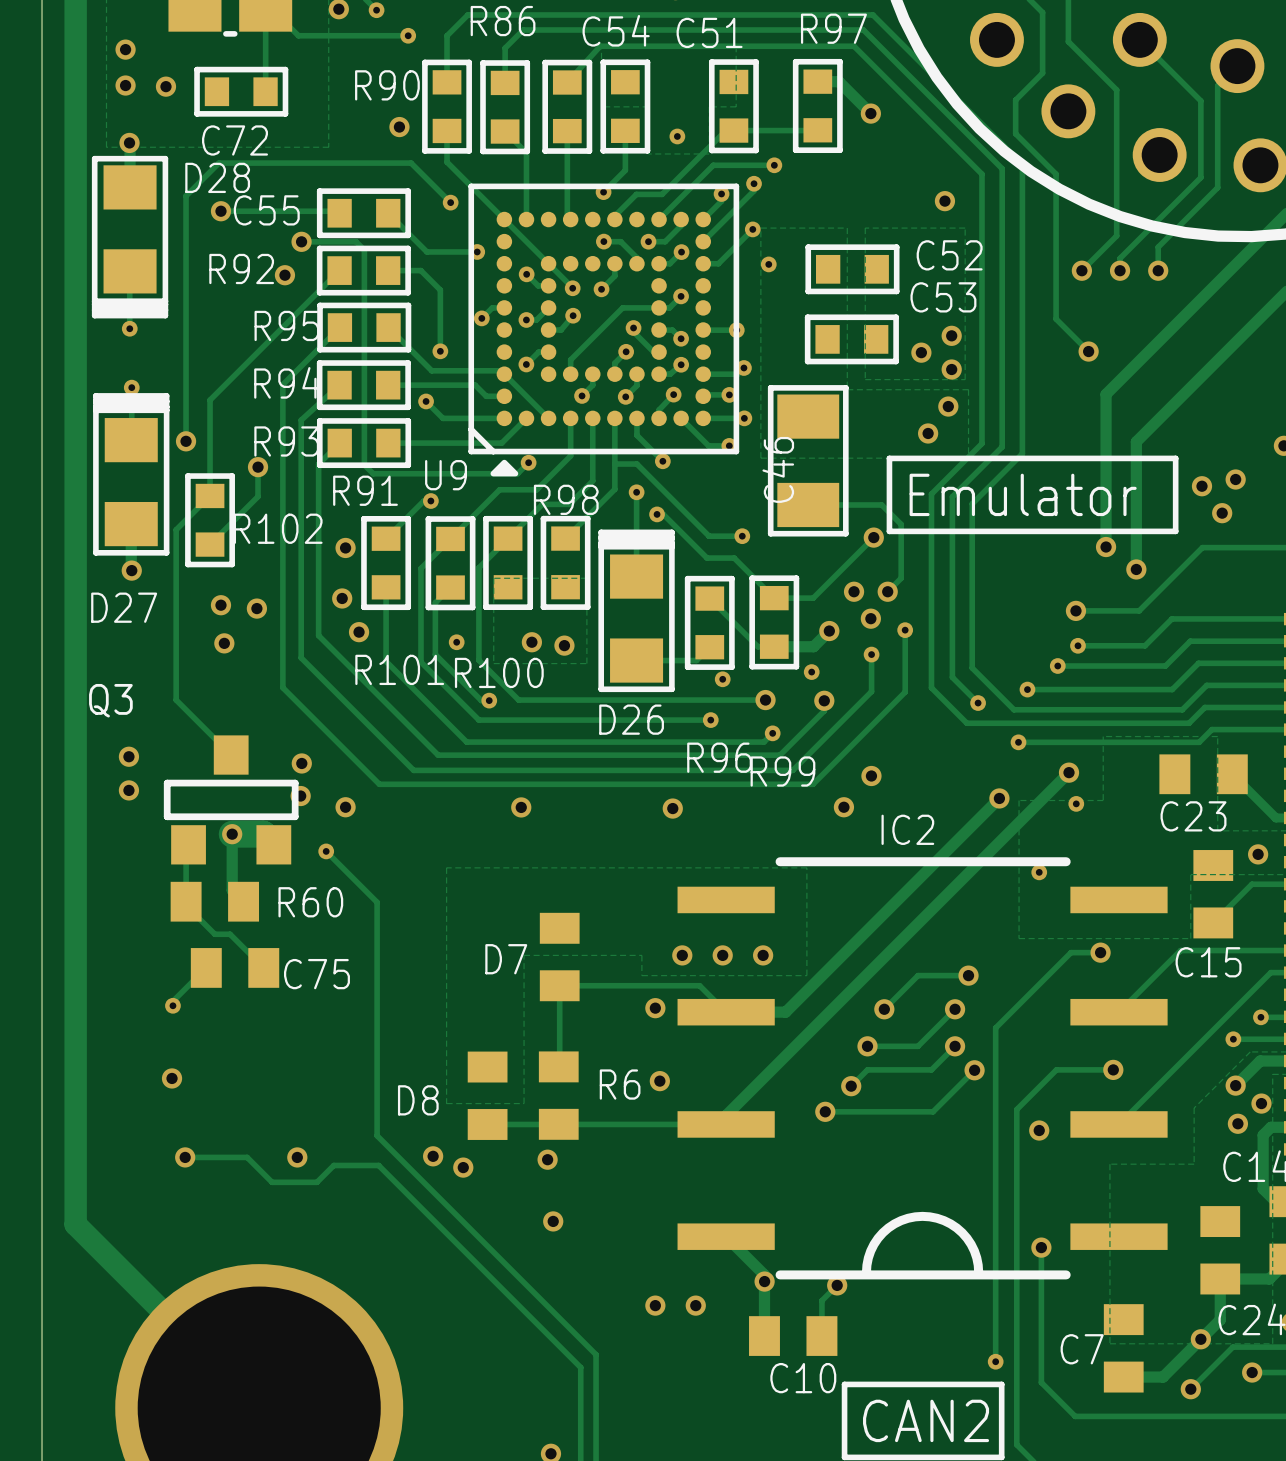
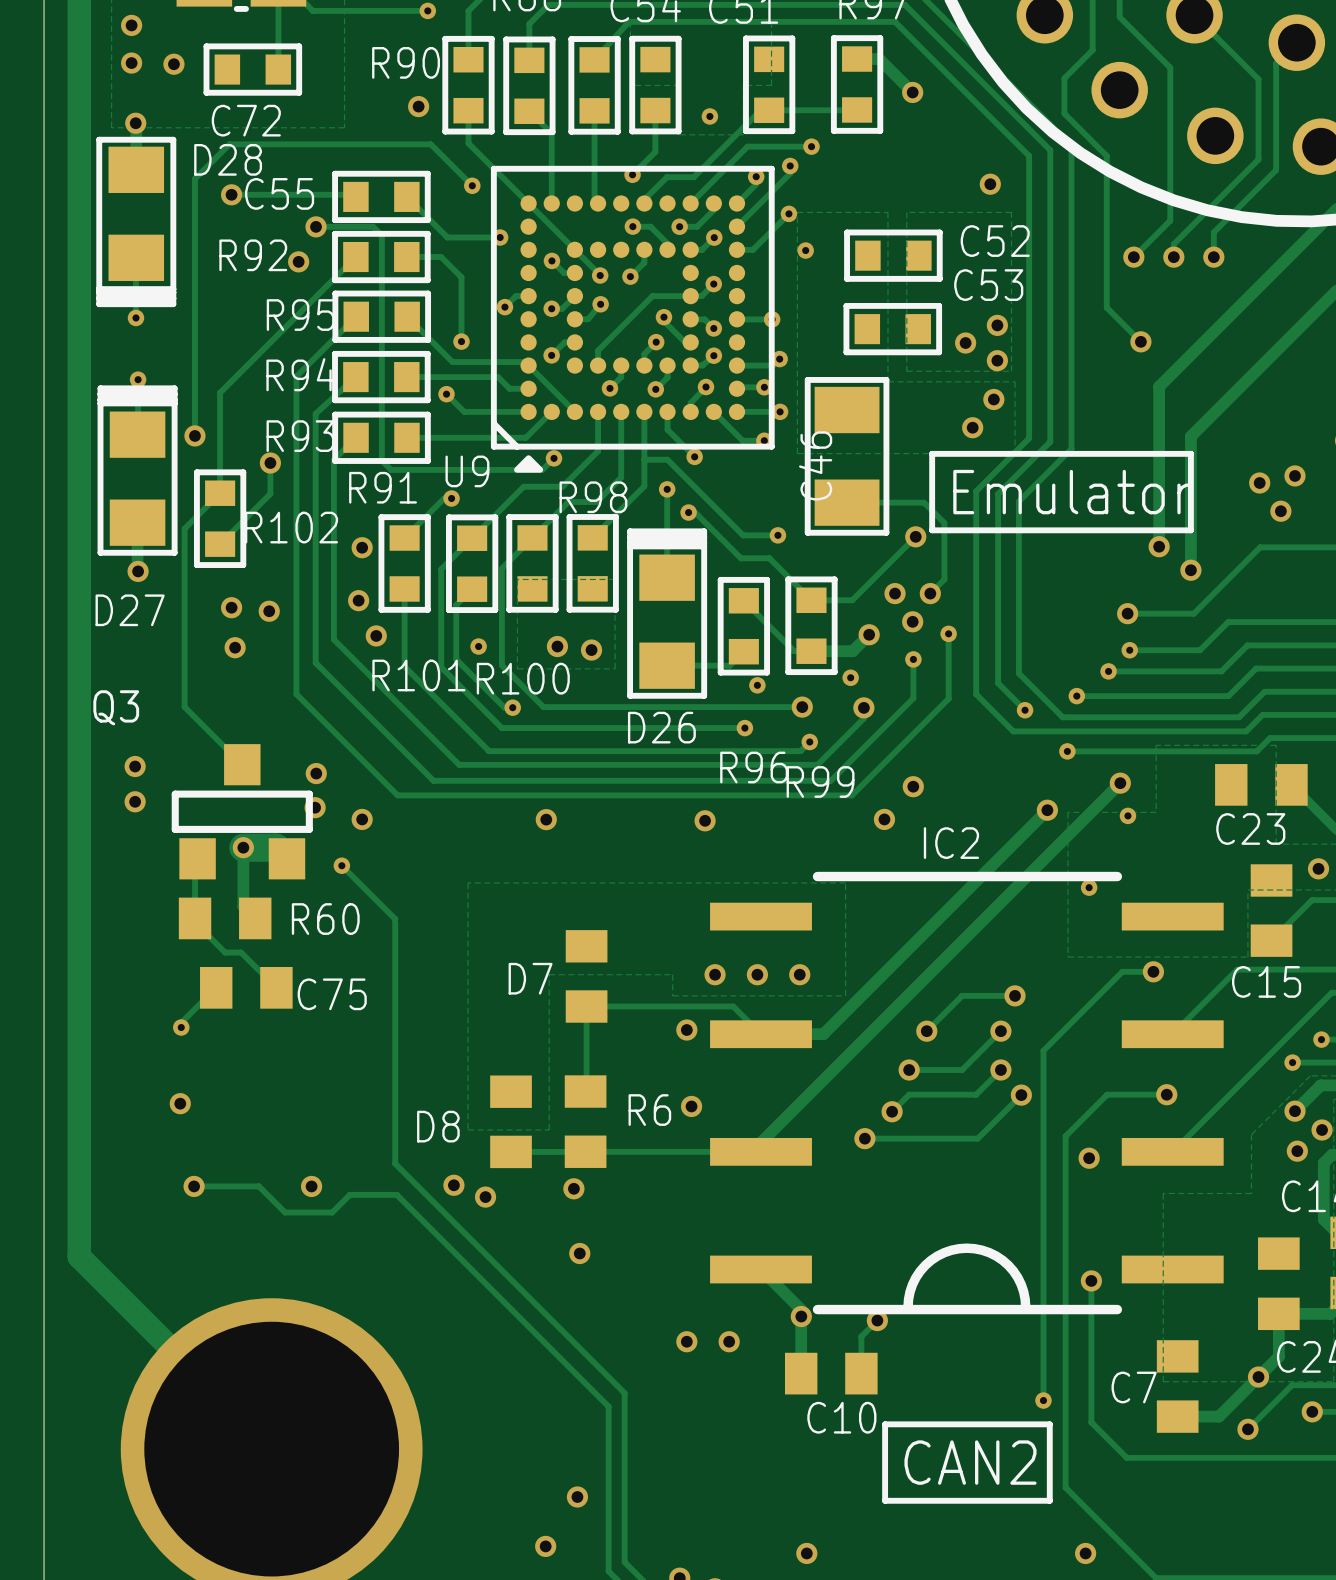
line: (1136, 458) (1175, 458) (1175, 531) (1136, 531) -> (1190, 453) (1190, 530)

